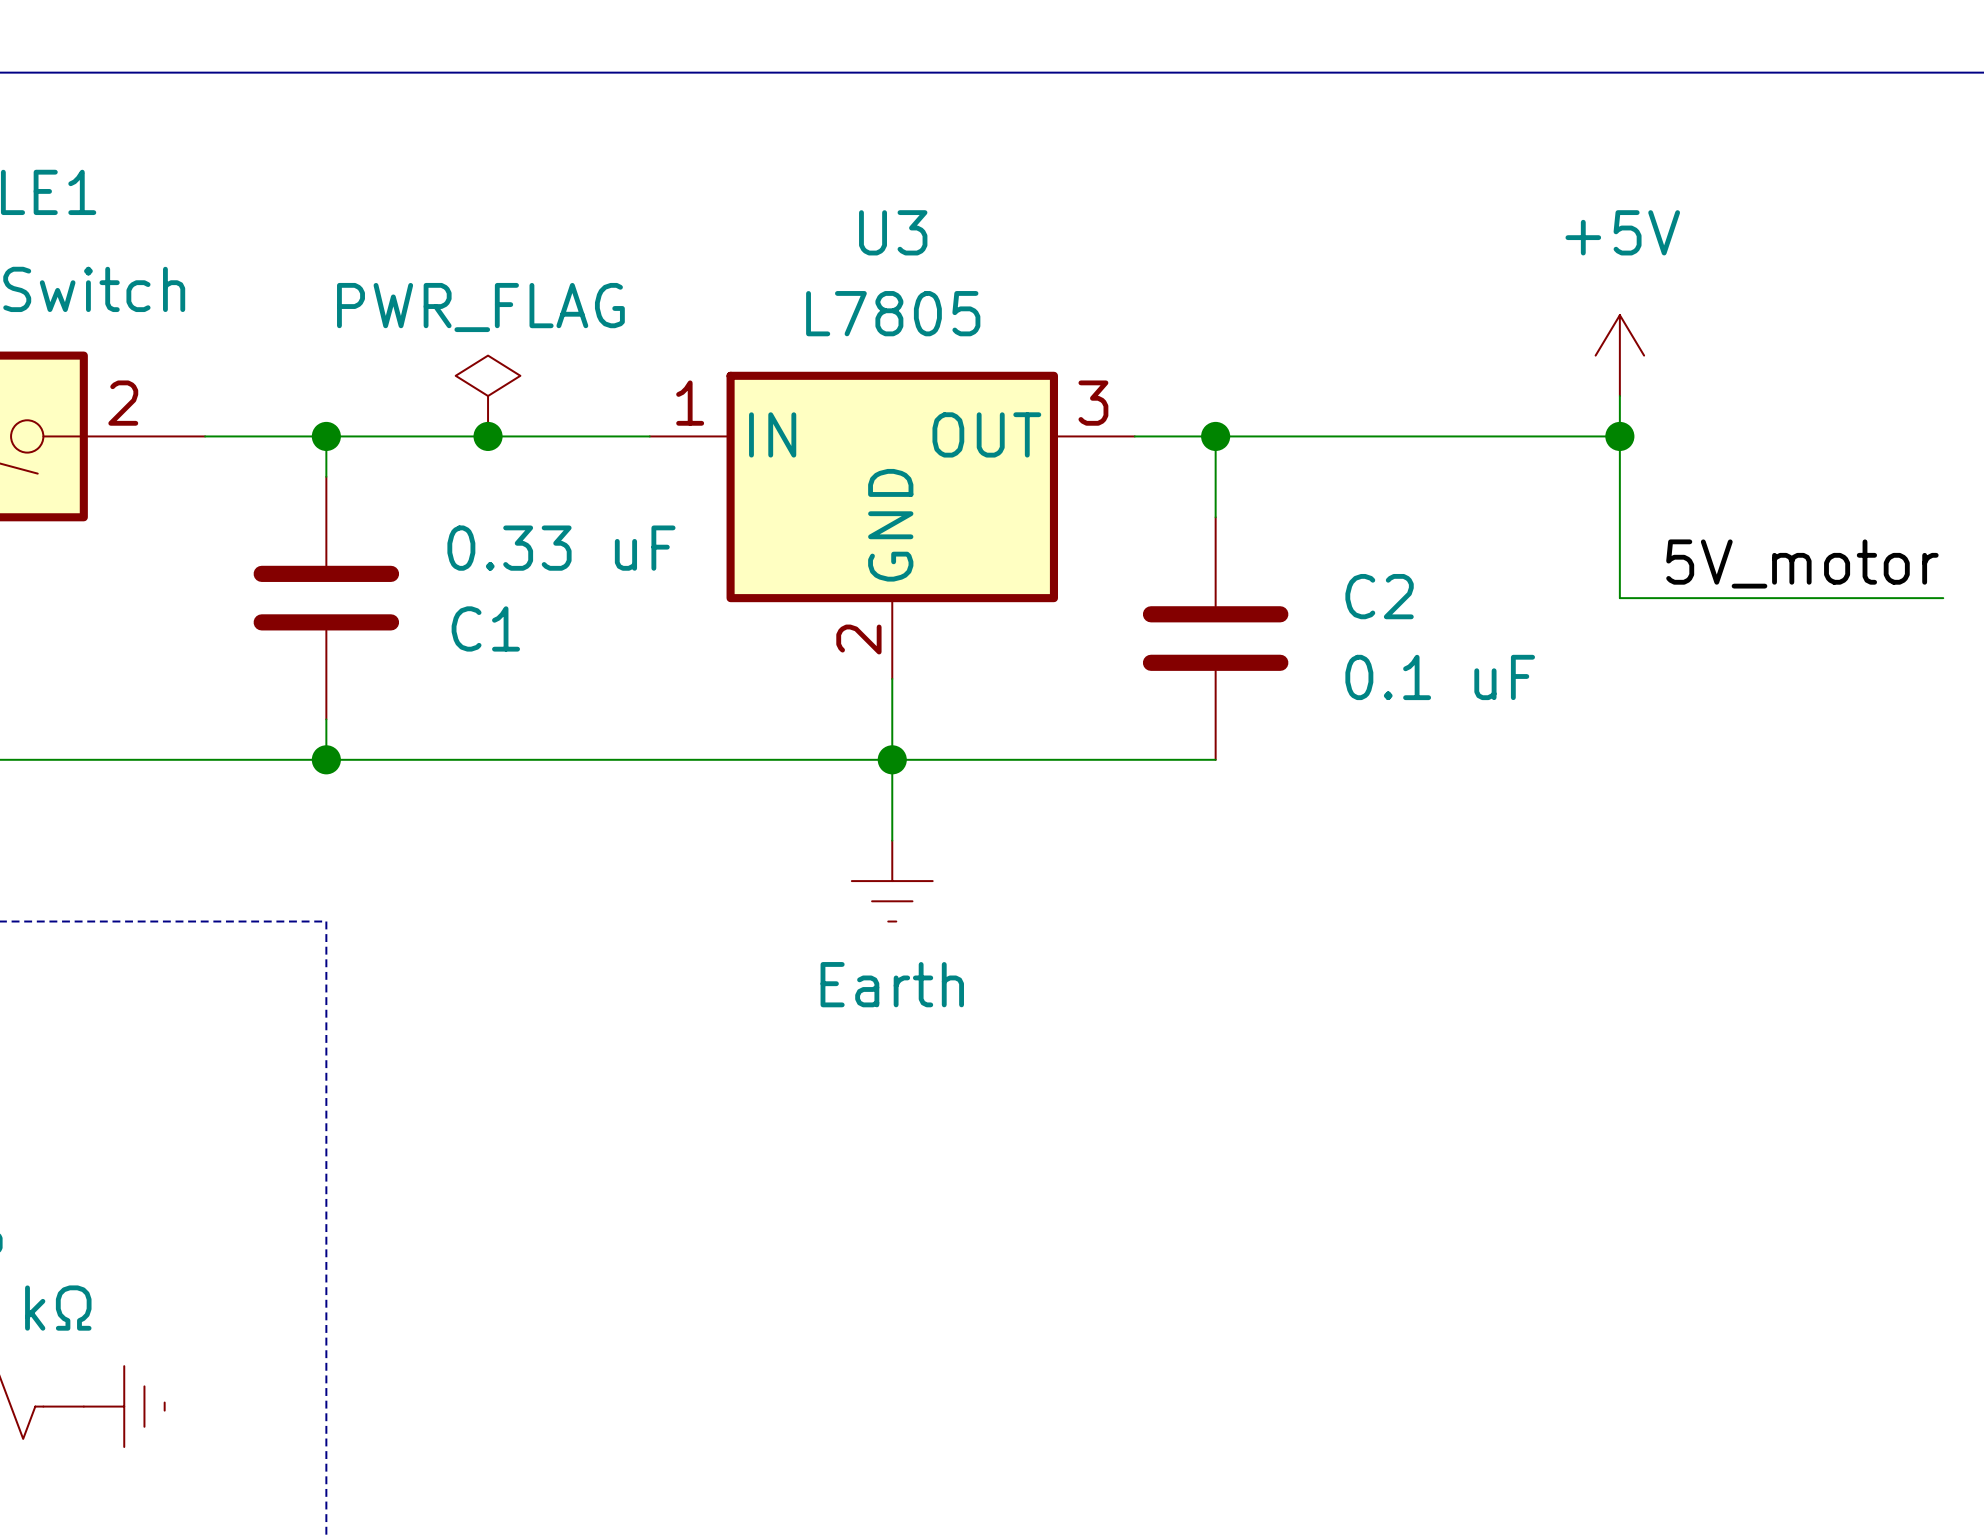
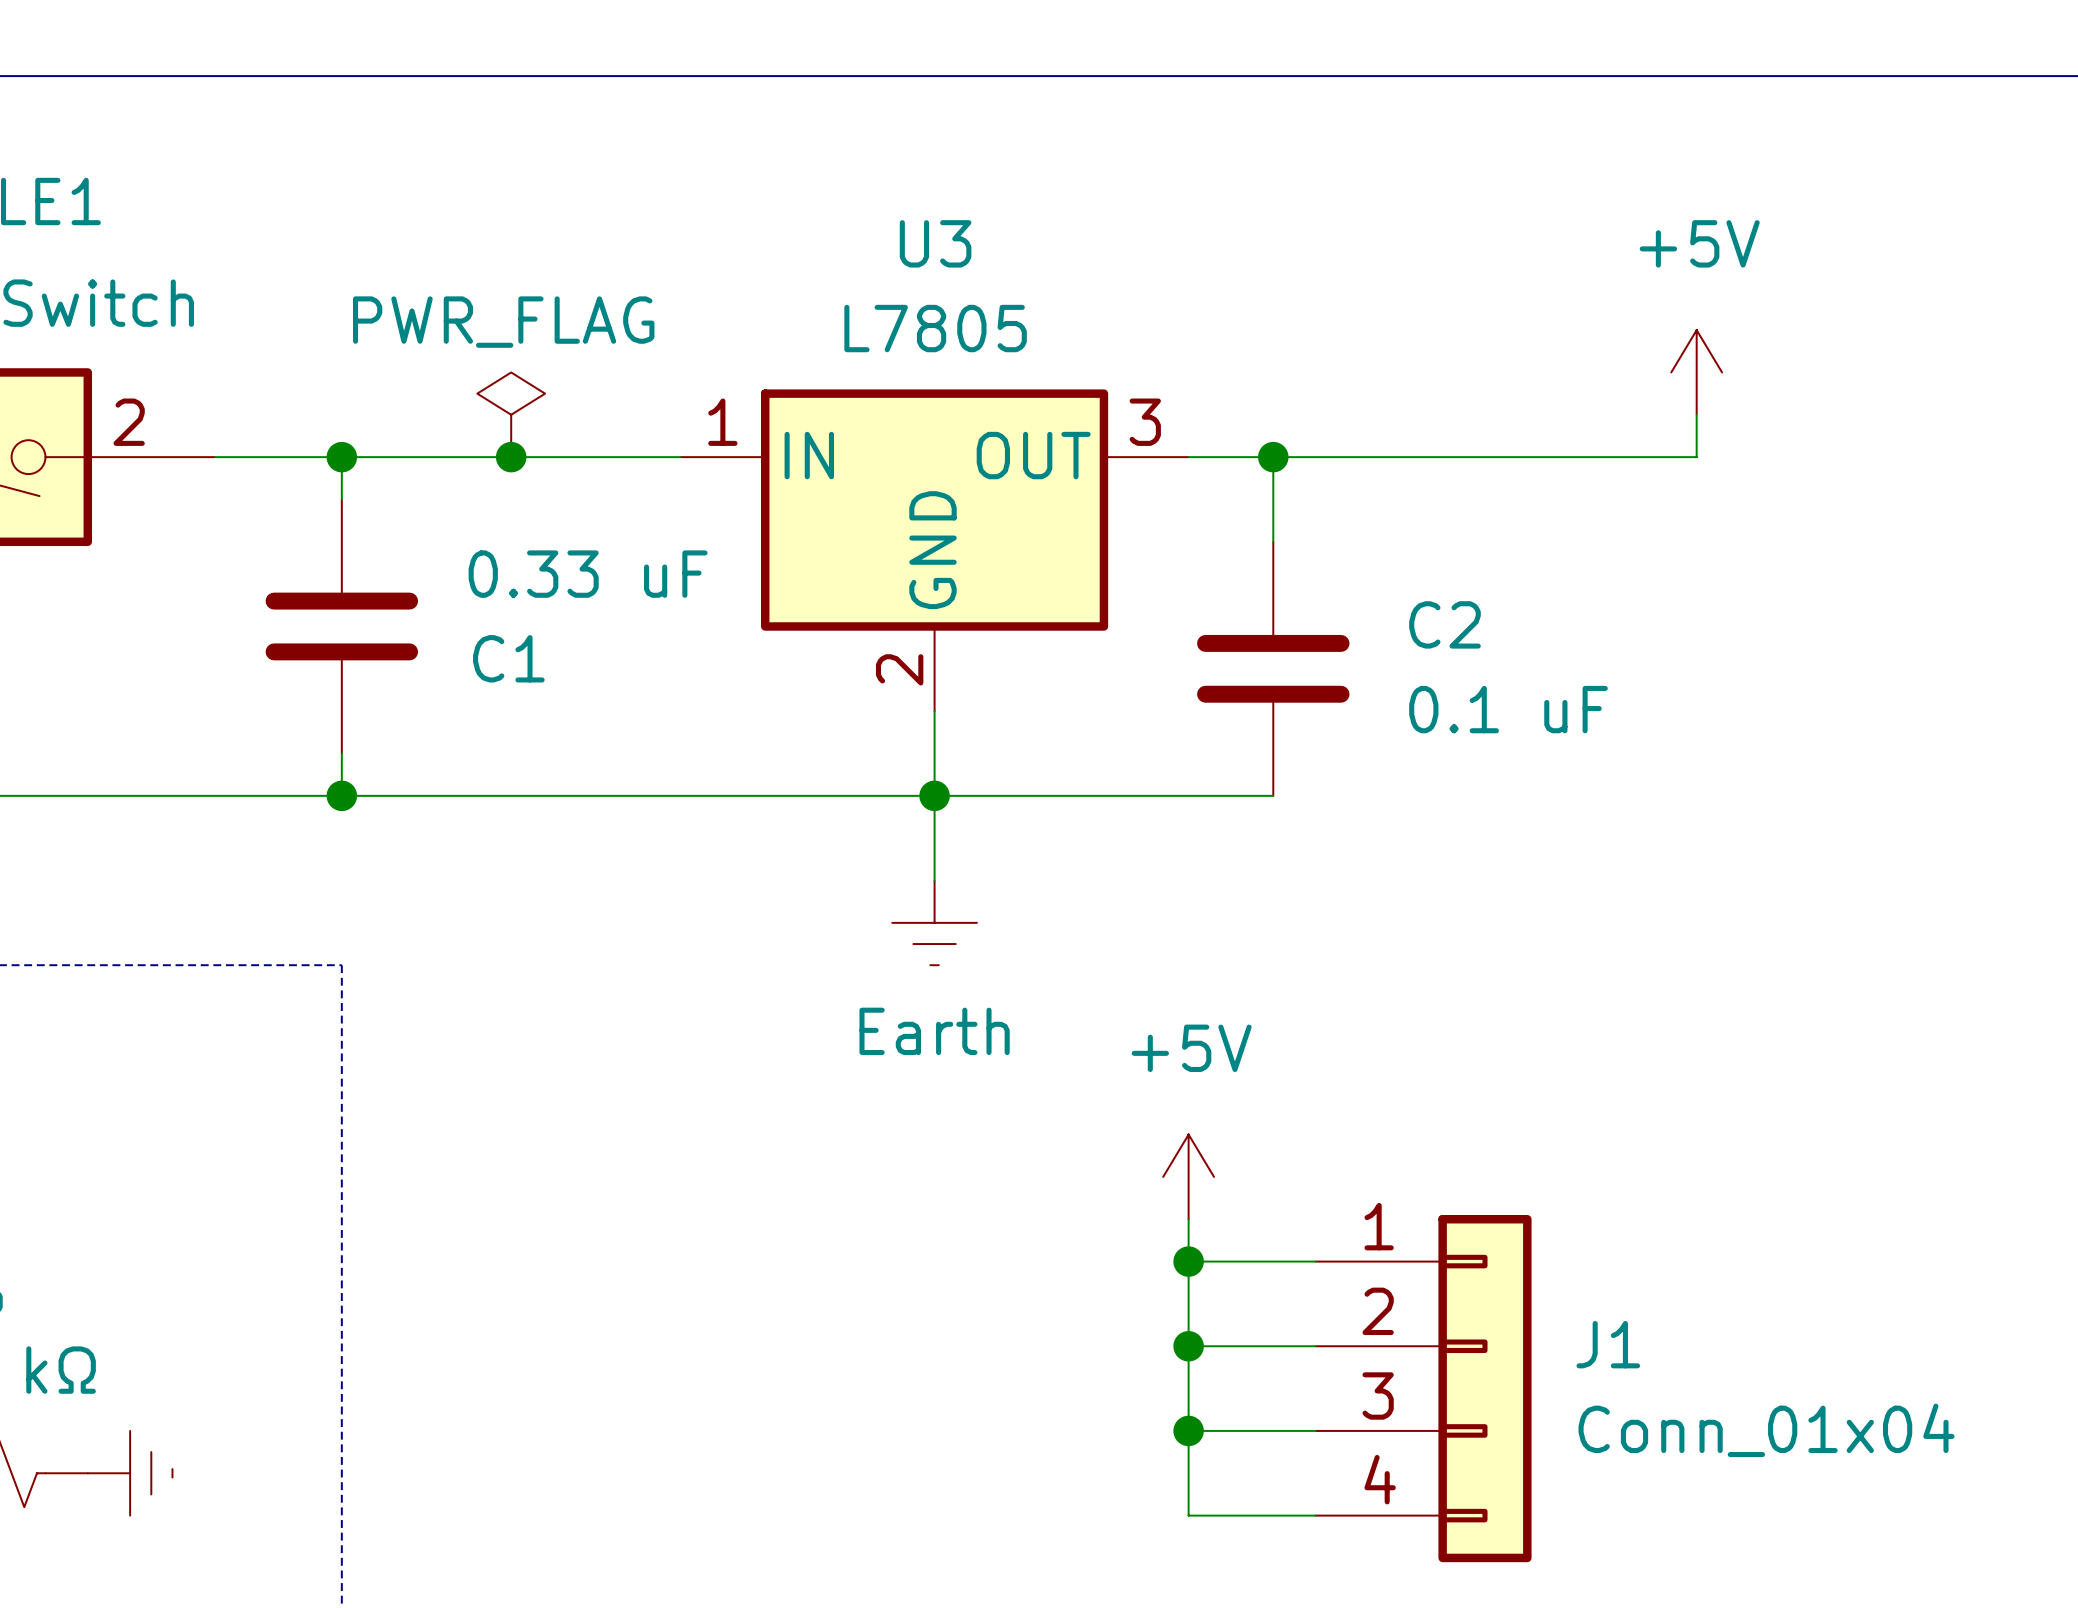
wire: (1619, 436) (1619, 598) (1943, 598) -> none
junction: (1619, 436) -> none
label: 5V_motor (1802, 563) -> none
power symbol: none -> +5V (1188, 1176)
wire: none -> (1188, 1219) (1188, 1515) (1315, 1515)
wire: none -> (1188, 1261) (1315, 1261)
junction: none -> (1188, 1261)
wire: none -> (1188, 1346) (1315, 1346)
junction: none -> (1188, 1346)
J1: none -> Conn_01x04 (1423, 1388)
wire: none -> (1188, 1430) (1315, 1430)
junction: none -> (1188, 1430)

